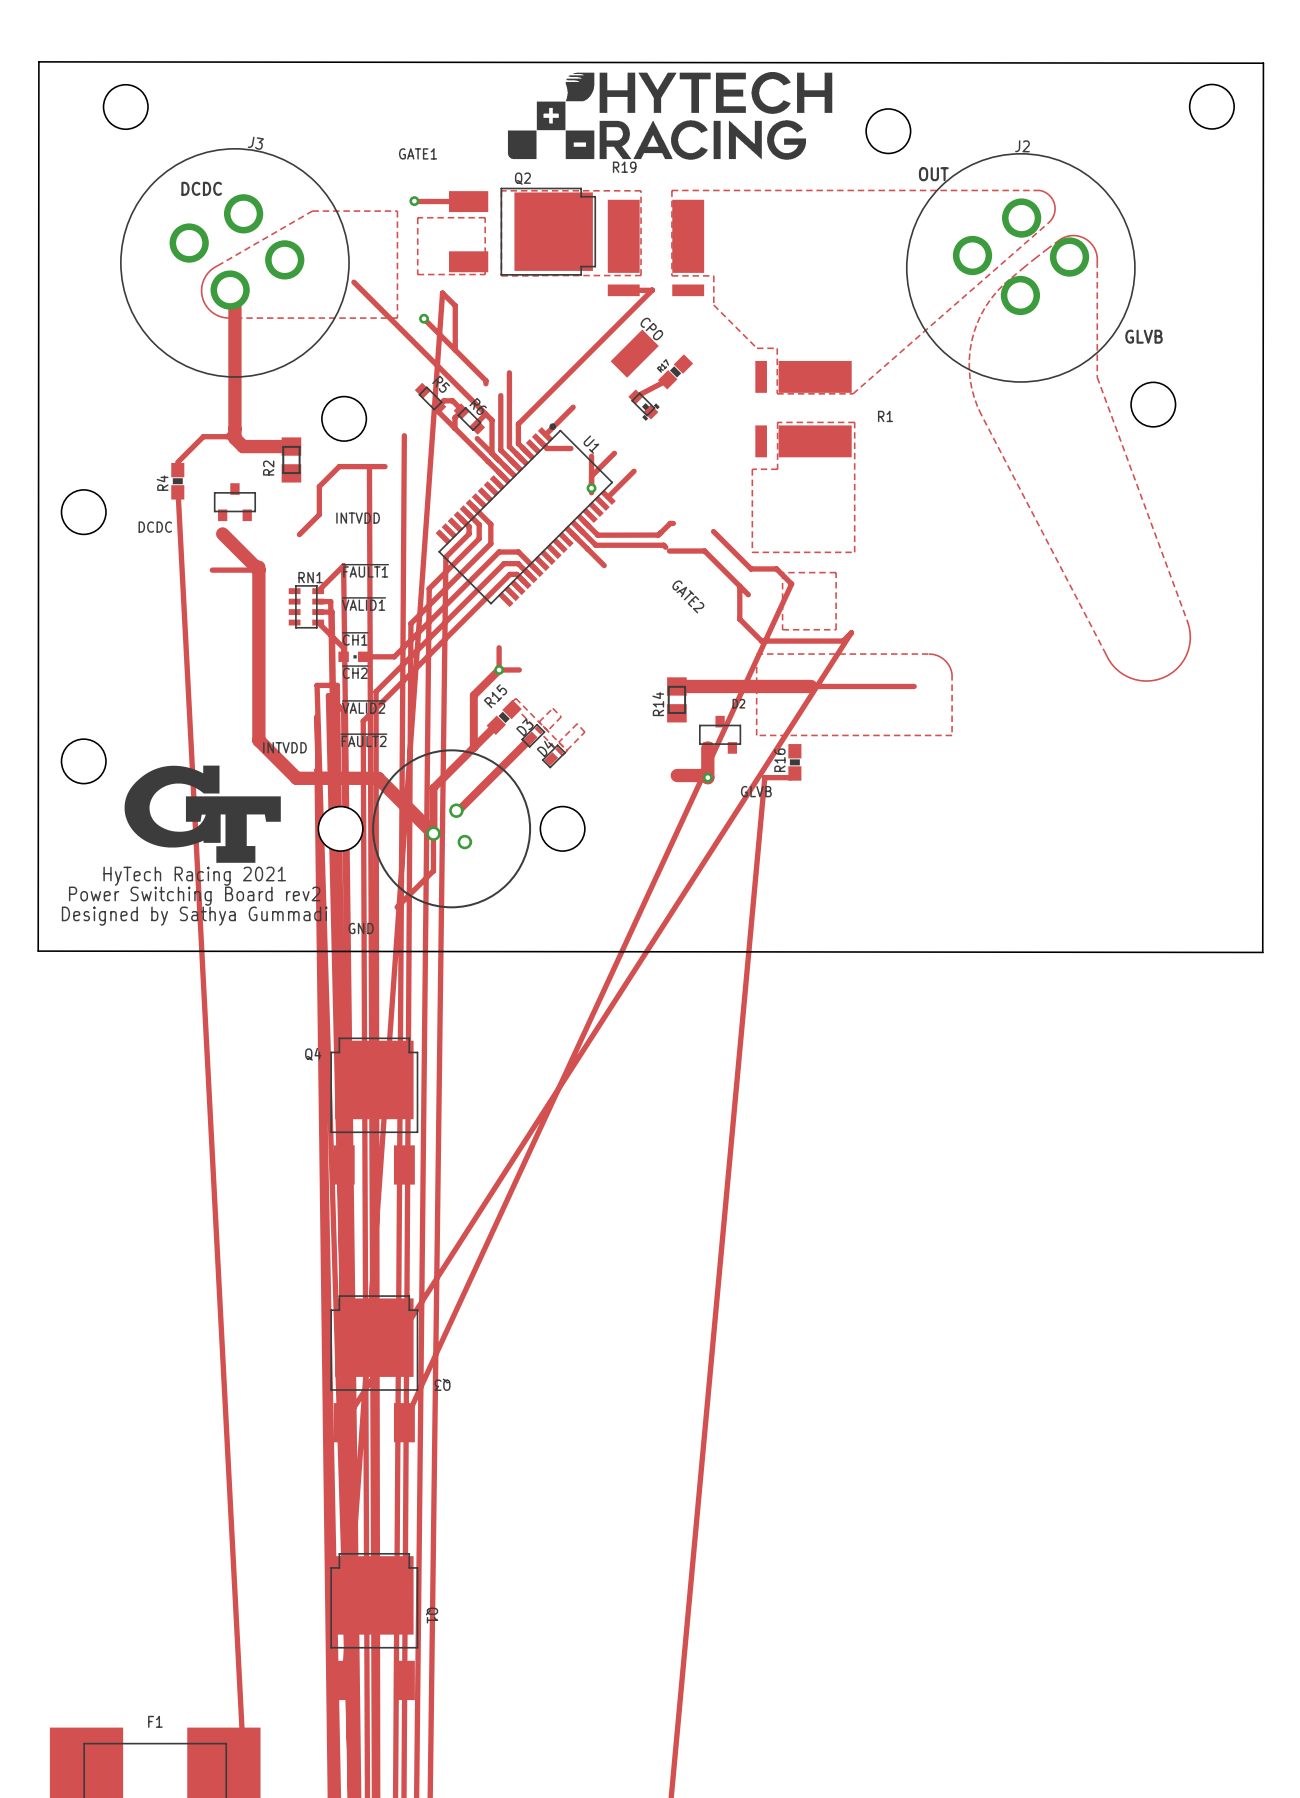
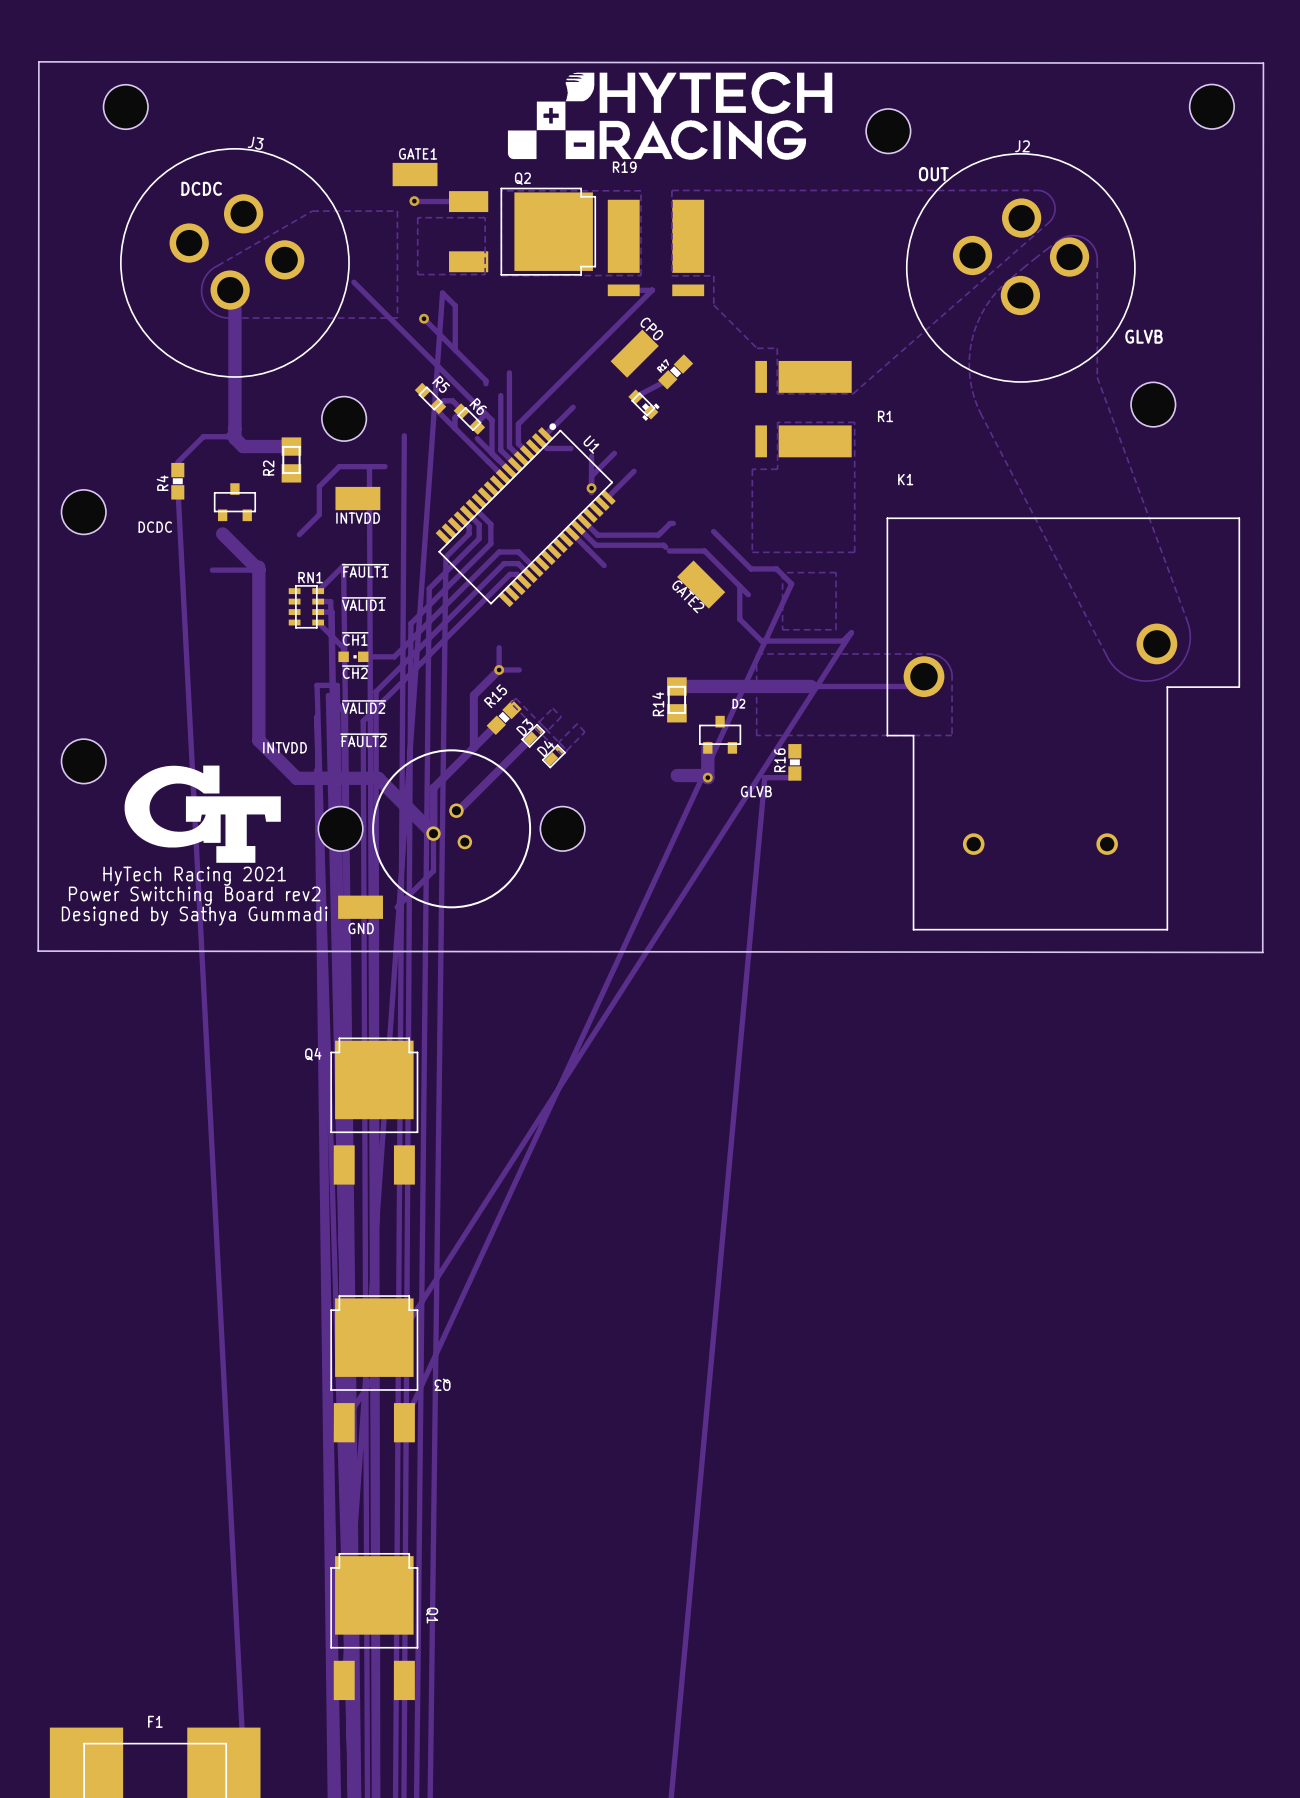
part: none -> (415, 174)
part: none -> (357, 498)
part: none -> (701, 584)
K1: none -> (1063, 723)
part: none -> (360, 907)

